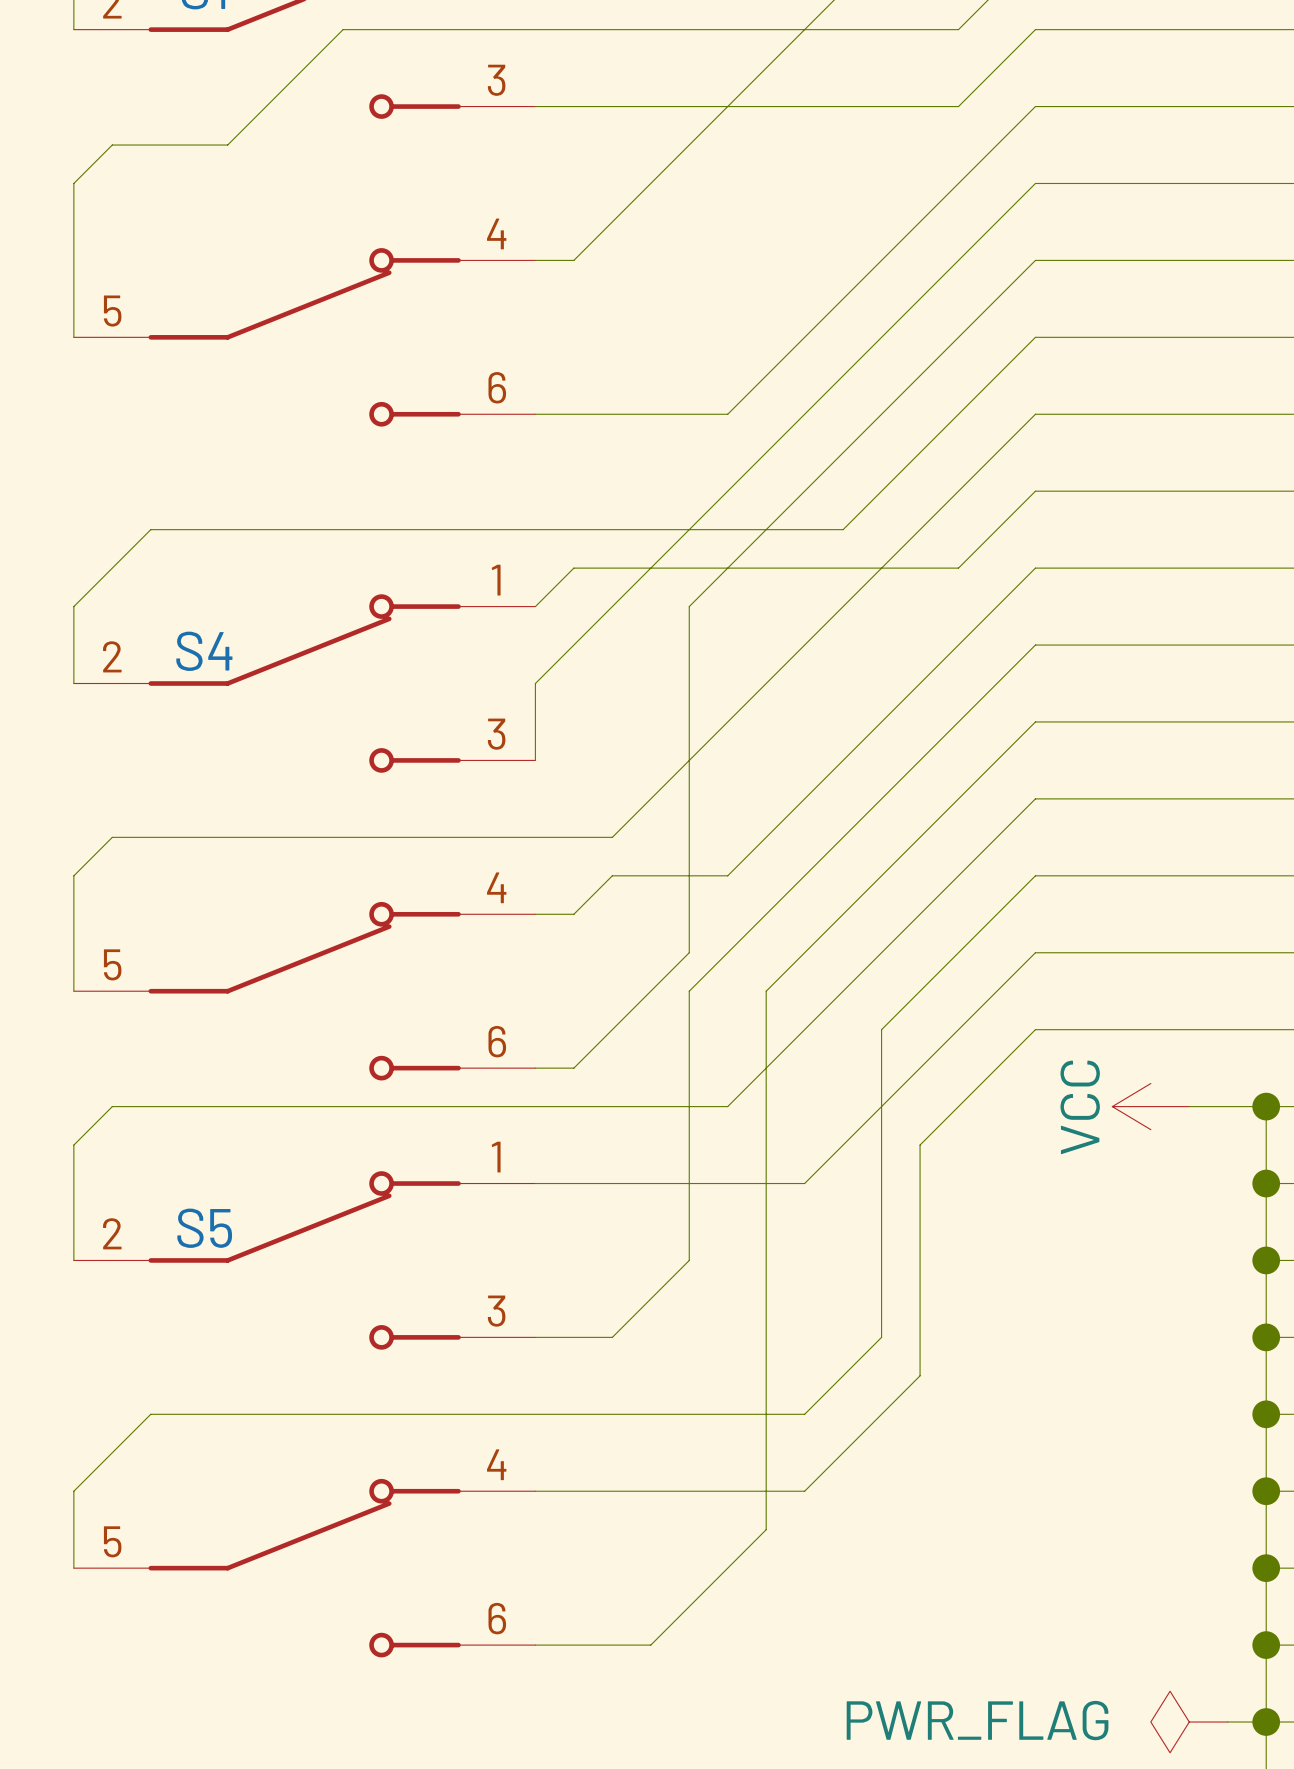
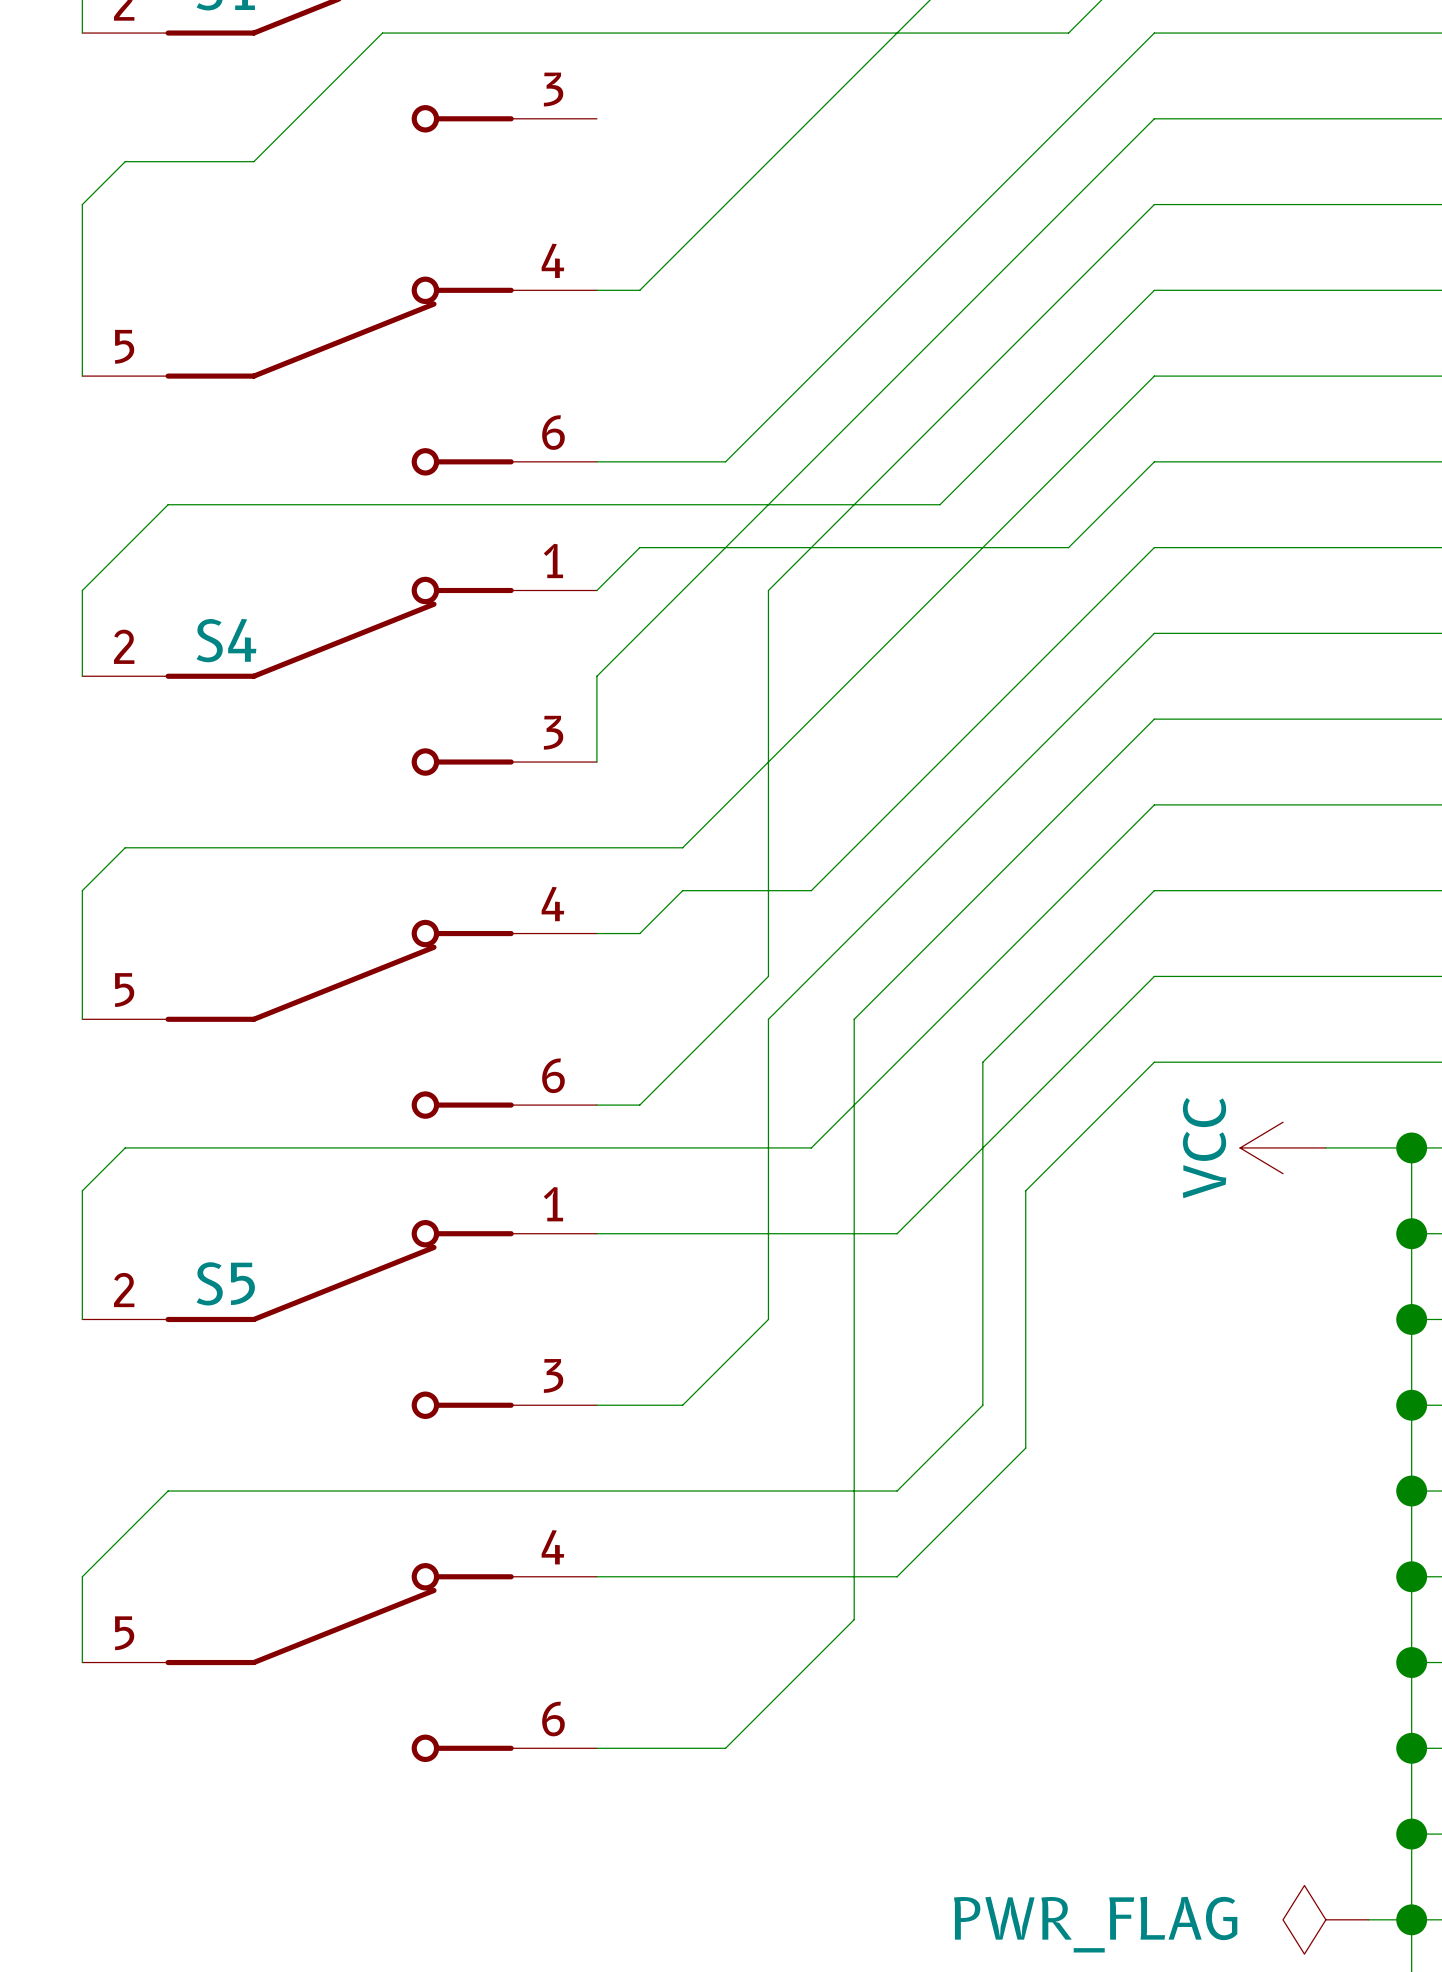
wire: (535, 106) (958, 106) -> (725, 461) (1068, 118)
wire: (650, 414) (727, 414) -> (639, 633) (811, 461)
wire: (843, 452) (689, 606) -> (768, 590) (768, 676)
wire: none -> (939, 504) (168, 504) (82, 590) (82, 676)
wire: (958, 491) (612, 837) (573, 837) -> (1068, 633) (811, 890) (682, 890) (639, 933)
wire: none -> (1068, 547) (639, 547) (596, 590)
wire: (689, 529) (535, 683) (535, 760) -> none
wire: (843, 529) (150, 529) (73, 606) (73, 683) -> (939, 590) (682, 847) (125, 847) (82, 890) (82, 976)
wire: (573, 568) (958, 568) -> none
S4 position: (304, 837) -> (339, 847)
wire: (535, 837) (112, 837) (73, 875) -> none
wire: (689, 875) (689, 914) -> (811, 976) (768, 1019)
wire: (727, 875) (612, 875) (573, 914) (535, 914) -> none
wire: (73, 914) (73, 991) -> (596, 676) (596, 762)
wire: (766, 914) (689, 991) -> (768, 1062) (768, 1105)
wire: (689, 952) (573, 1068) (535, 1068) -> (768, 976) (639, 1105) (596, 1105)
wire: (881, 952) (727, 1106) -> (982, 1062) (982, 1147) (897, 1233) (811, 1233)
wire: (1189, 1029) (1035, 1029) (920, 1145) -> (1025, 1190) (1025, 1276)
junction: none -> (1411, 1147)
wire: (920, 1068) (804, 1183) (535, 1183) -> none
wire: (535, 1106) (112, 1106) (73, 1145) -> (854, 1019) (854, 1105) (811, 1147) (125, 1147) (82, 1190) (82, 1276)
power symbol position: VCC (1150, 1106) -> VCC (1283, 1147)
wire: (1189, 1106) (1266, 1106) -> (1411, 1147) (1411, 1233)
wire: (73, 1183) (73, 1260) -> none
wire: (689, 1183) (689, 1260) (612, 1337) -> (768, 1319) (682, 1405) (596, 1405)
wire: (881, 1260) (881, 1337) -> (1025, 1448) (982, 1491)
wire: none -> (982, 1405) (897, 1491) (682, 1491)
wire: (920, 1298) (920, 1375) (804, 1491) (535, 1491) -> none
S5 position: (304, 1414) -> (339, 1491)
wire: (535, 1414) (150, 1414) (73, 1491) (73, 1568) -> (596, 1491) (168, 1491) (82, 1576) (82, 1662)
wire: (766, 1452) (766, 1529) (650, 1645) (535, 1645) -> (854, 1619) (725, 1748) (596, 1748)

